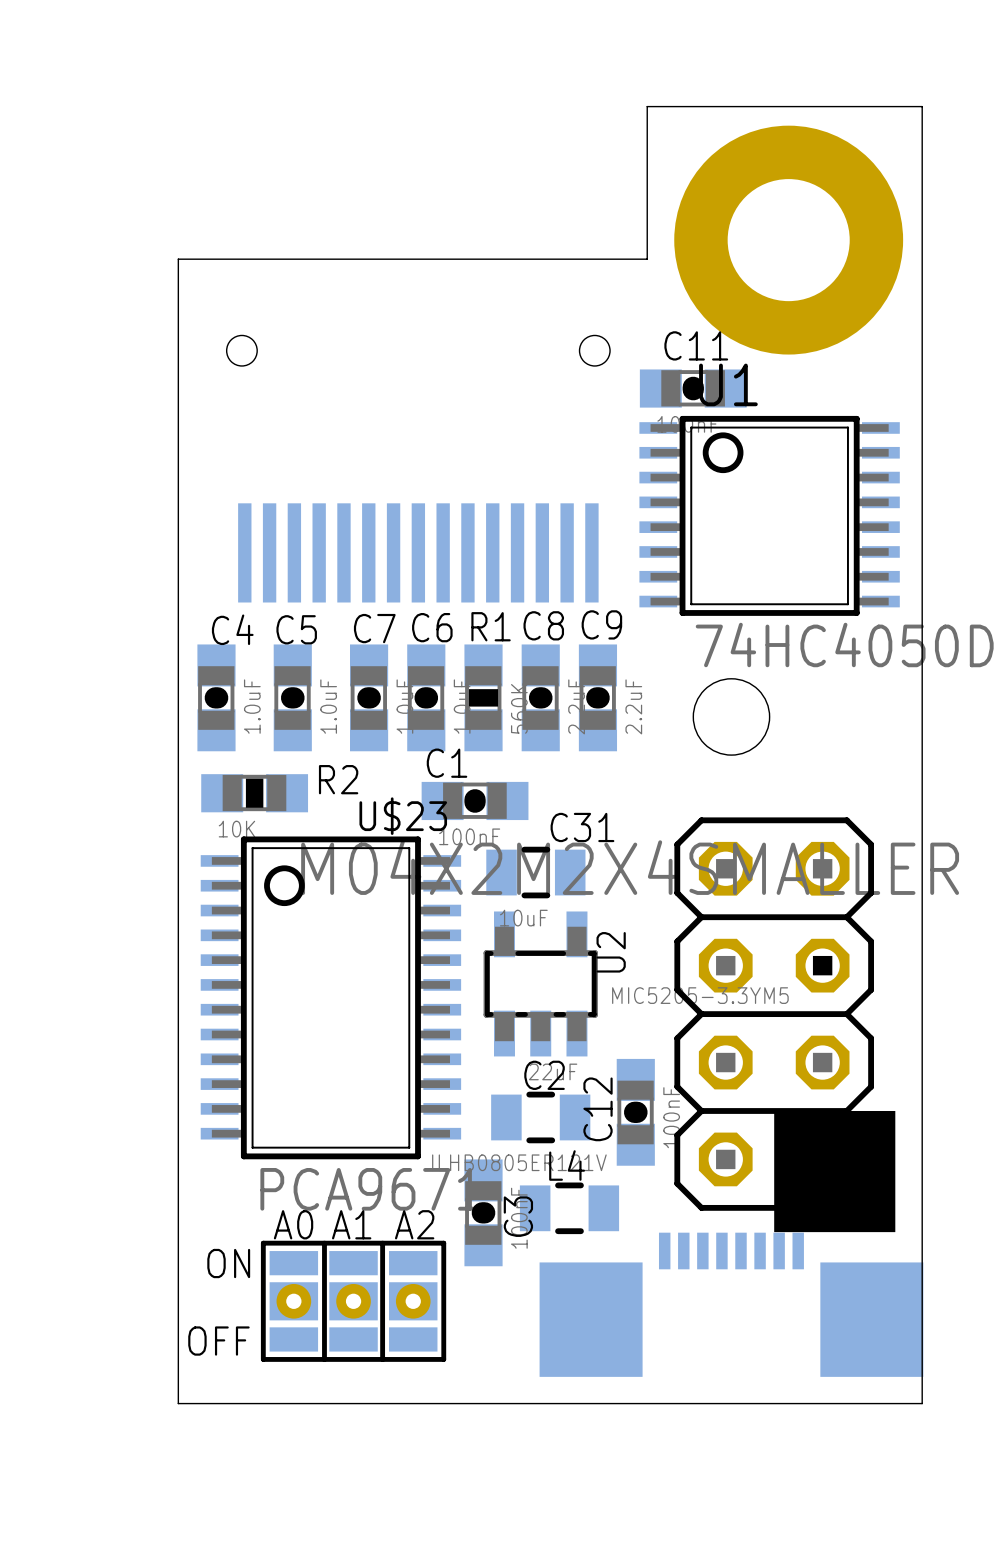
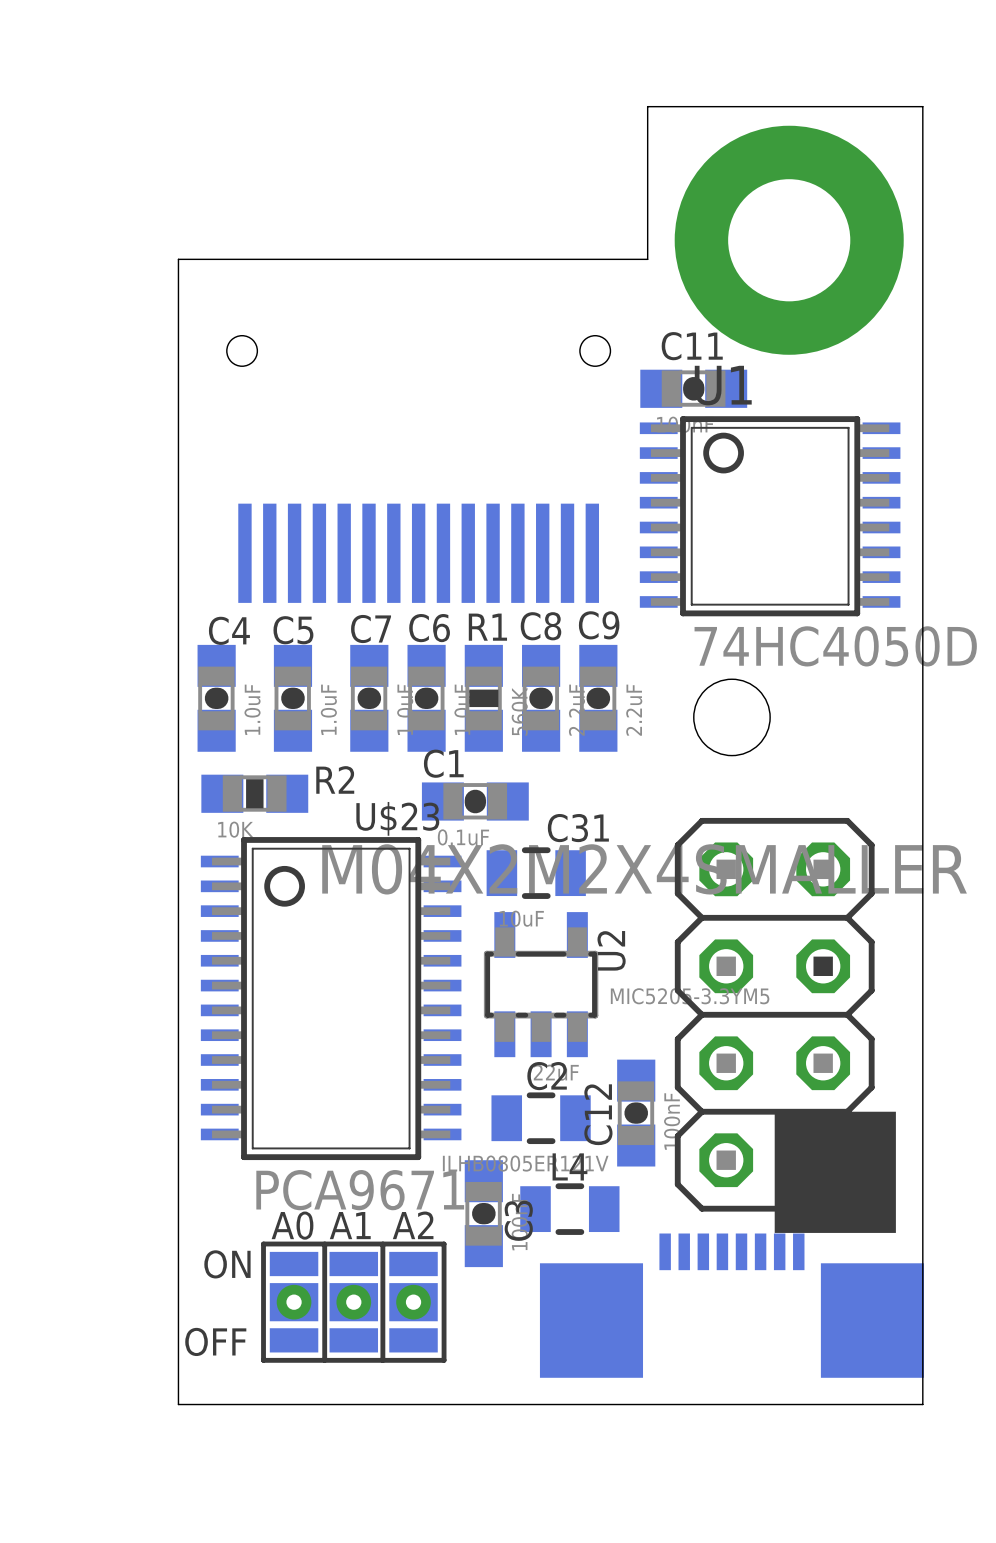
C1 value: 100nF (469, 836) -> 0.1uF (463, 837)

